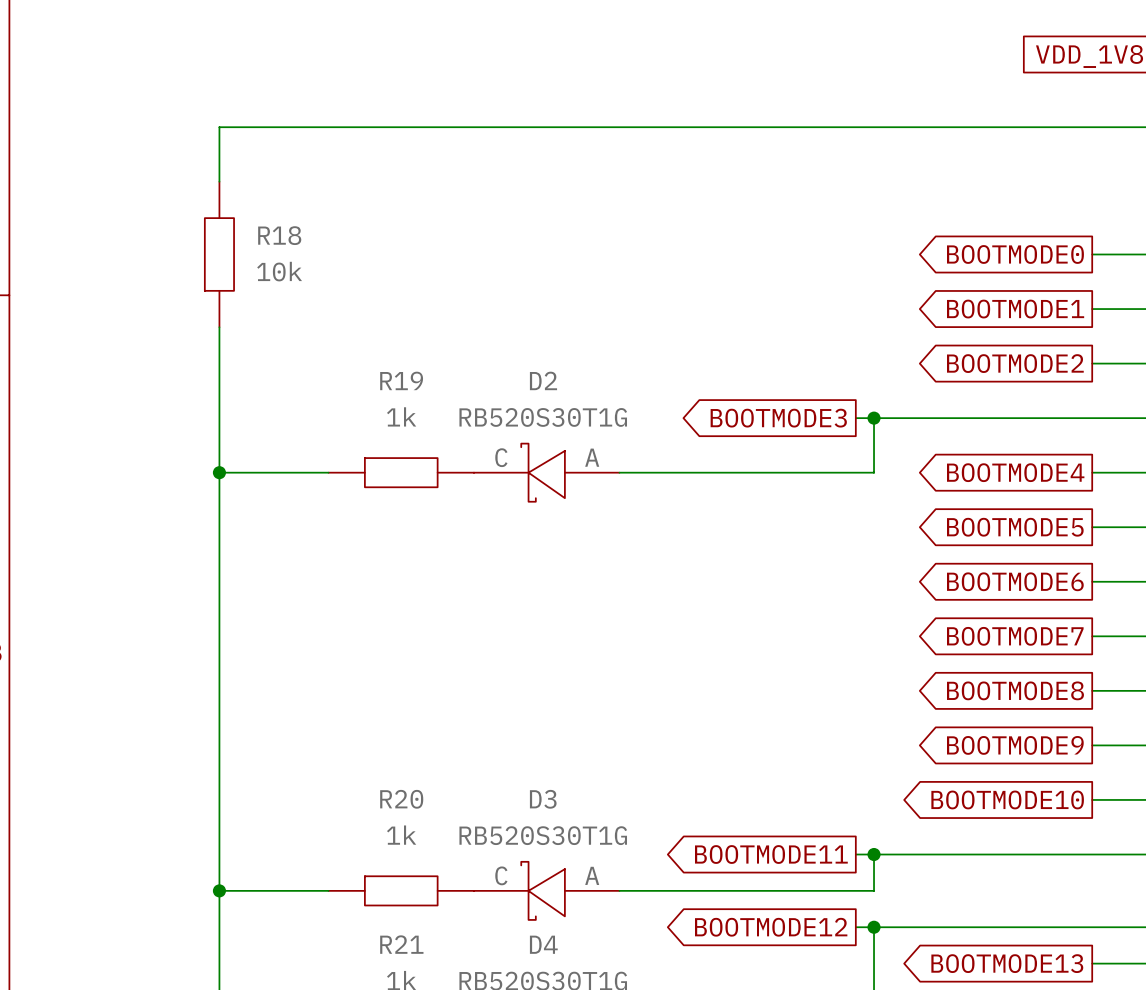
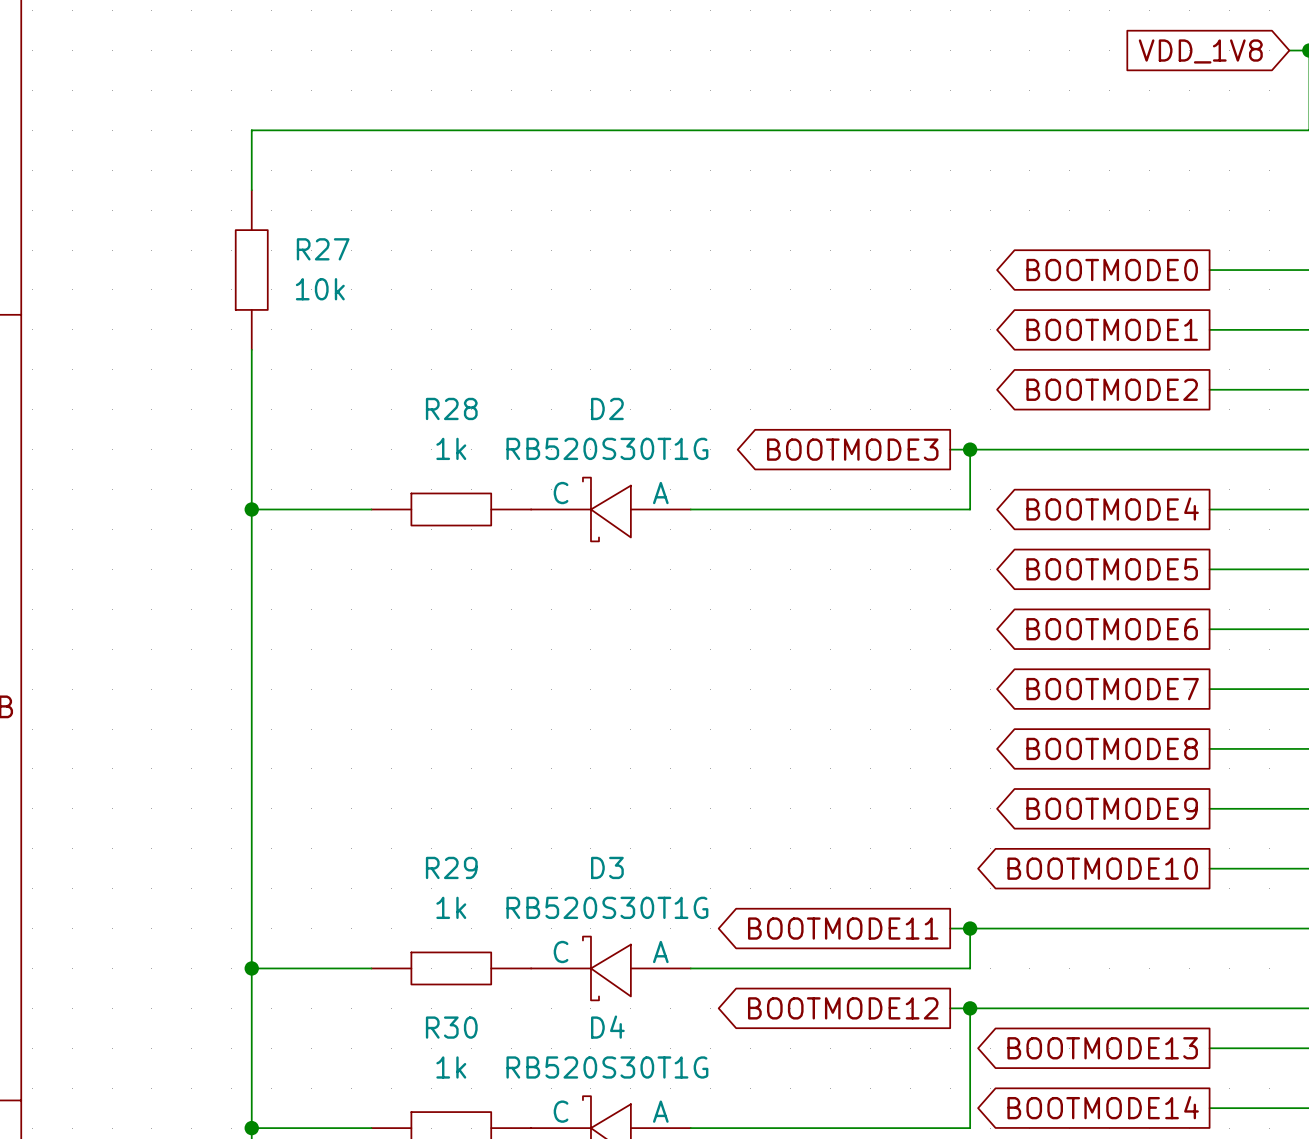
R18 name: R18 (279, 235) -> R27 (323, 249)
R19 name: R19 (401, 380) -> R28 (451, 408)
R20 name: R20 (401, 799) -> R29 (451, 867)
R21 name: R21 (401, 944) -> R30 (451, 1027)

